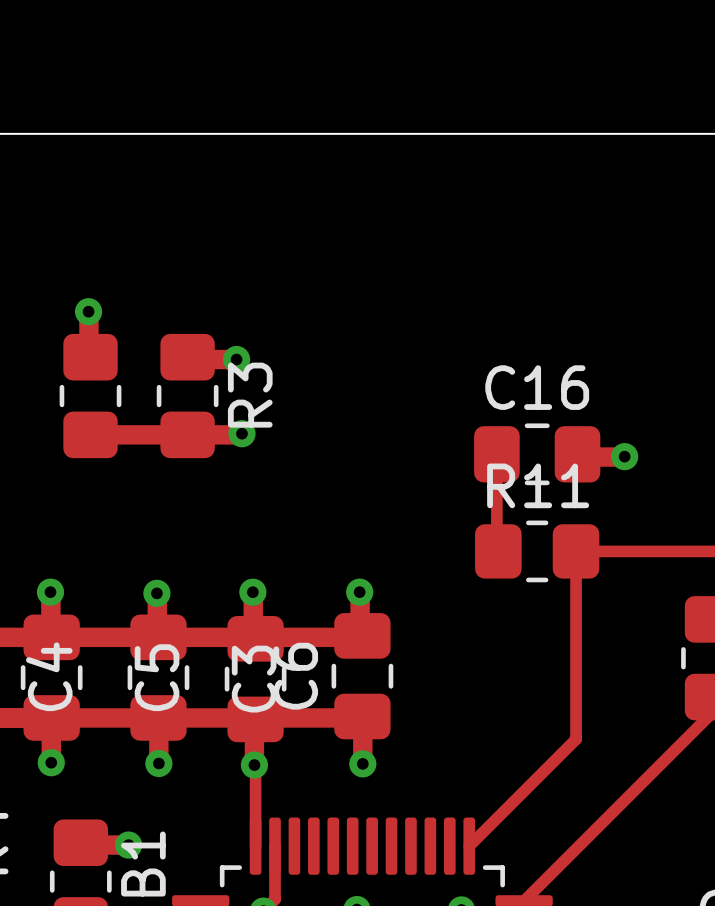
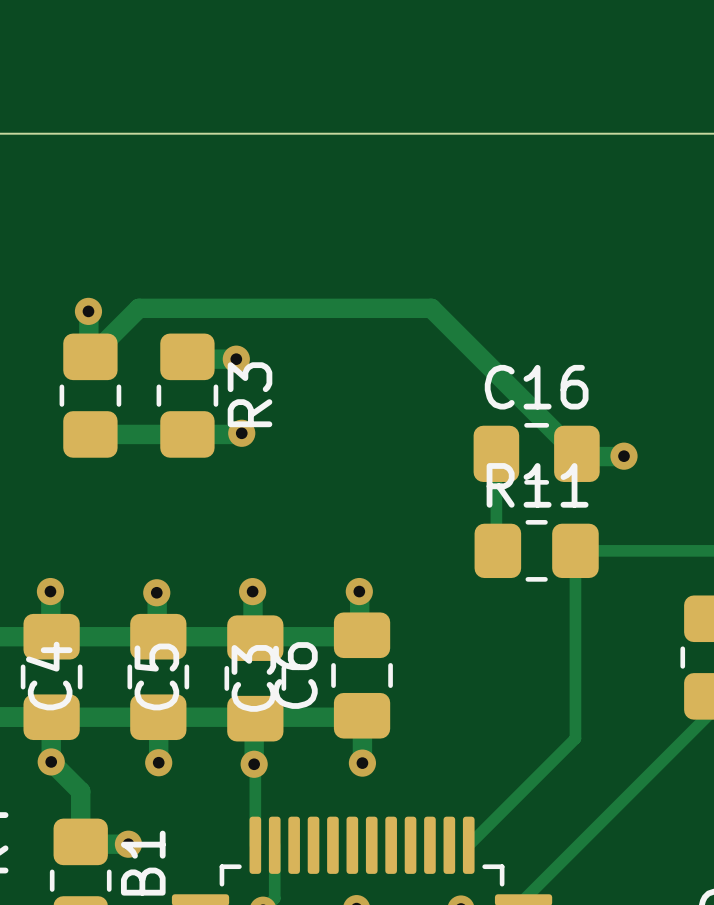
track: none -> (90, 356) (138, 308) (431, 308) (576, 453)
track: none -> (51, 761) (80, 791) (80, 841)

